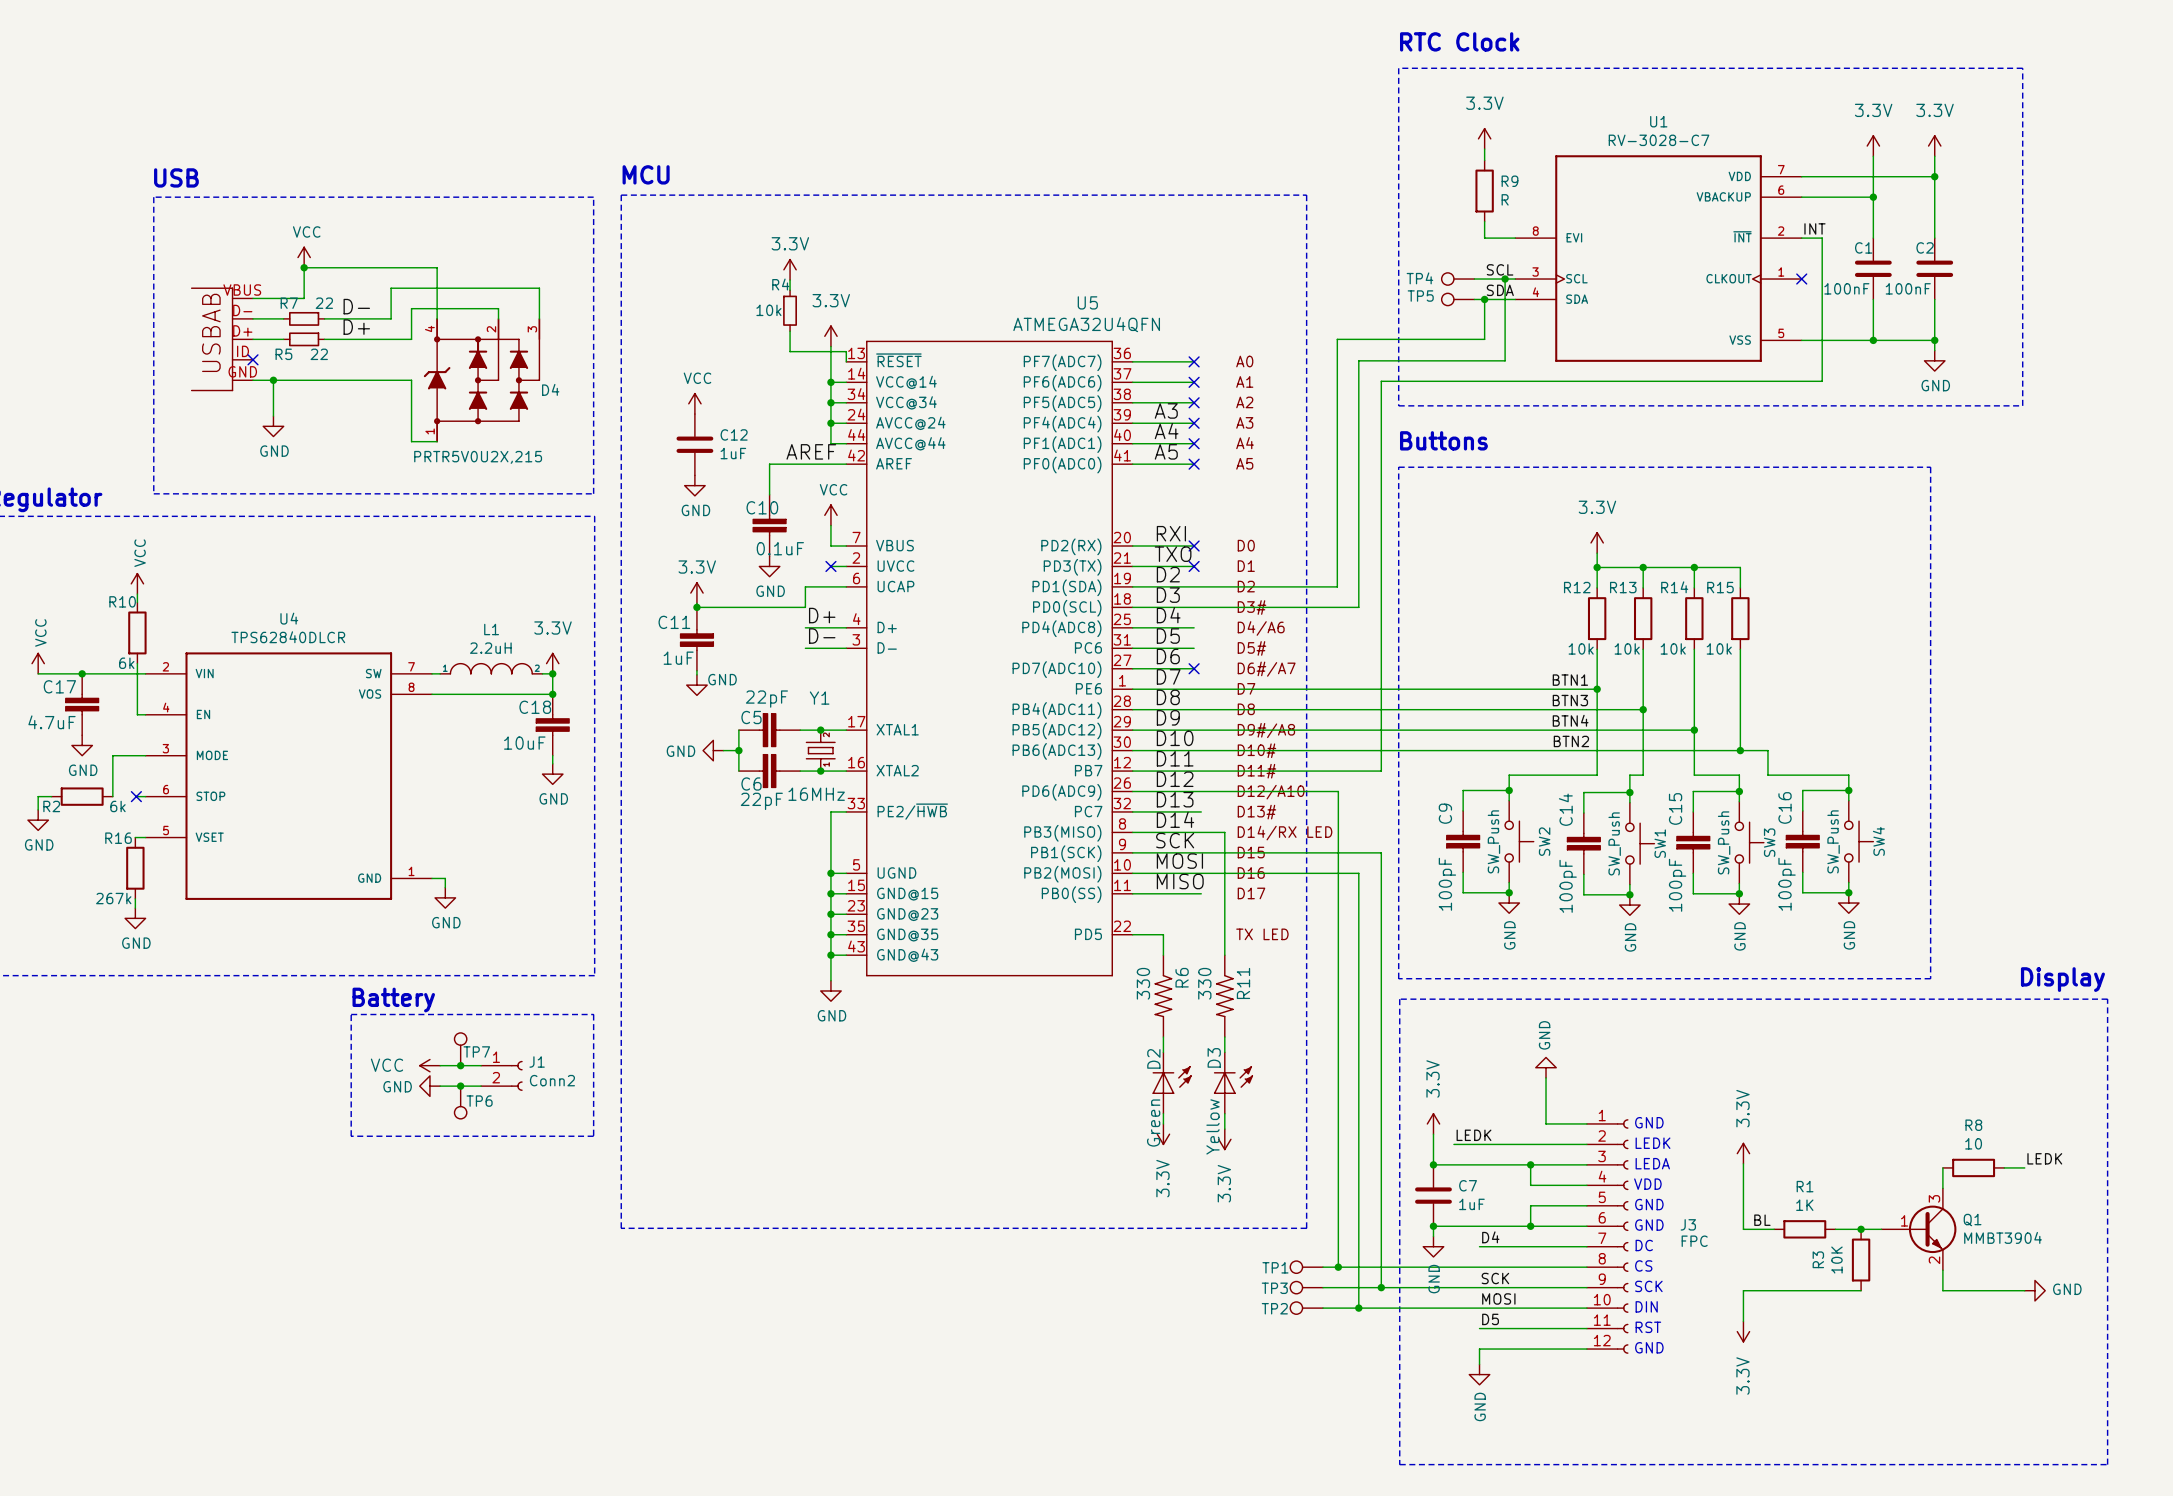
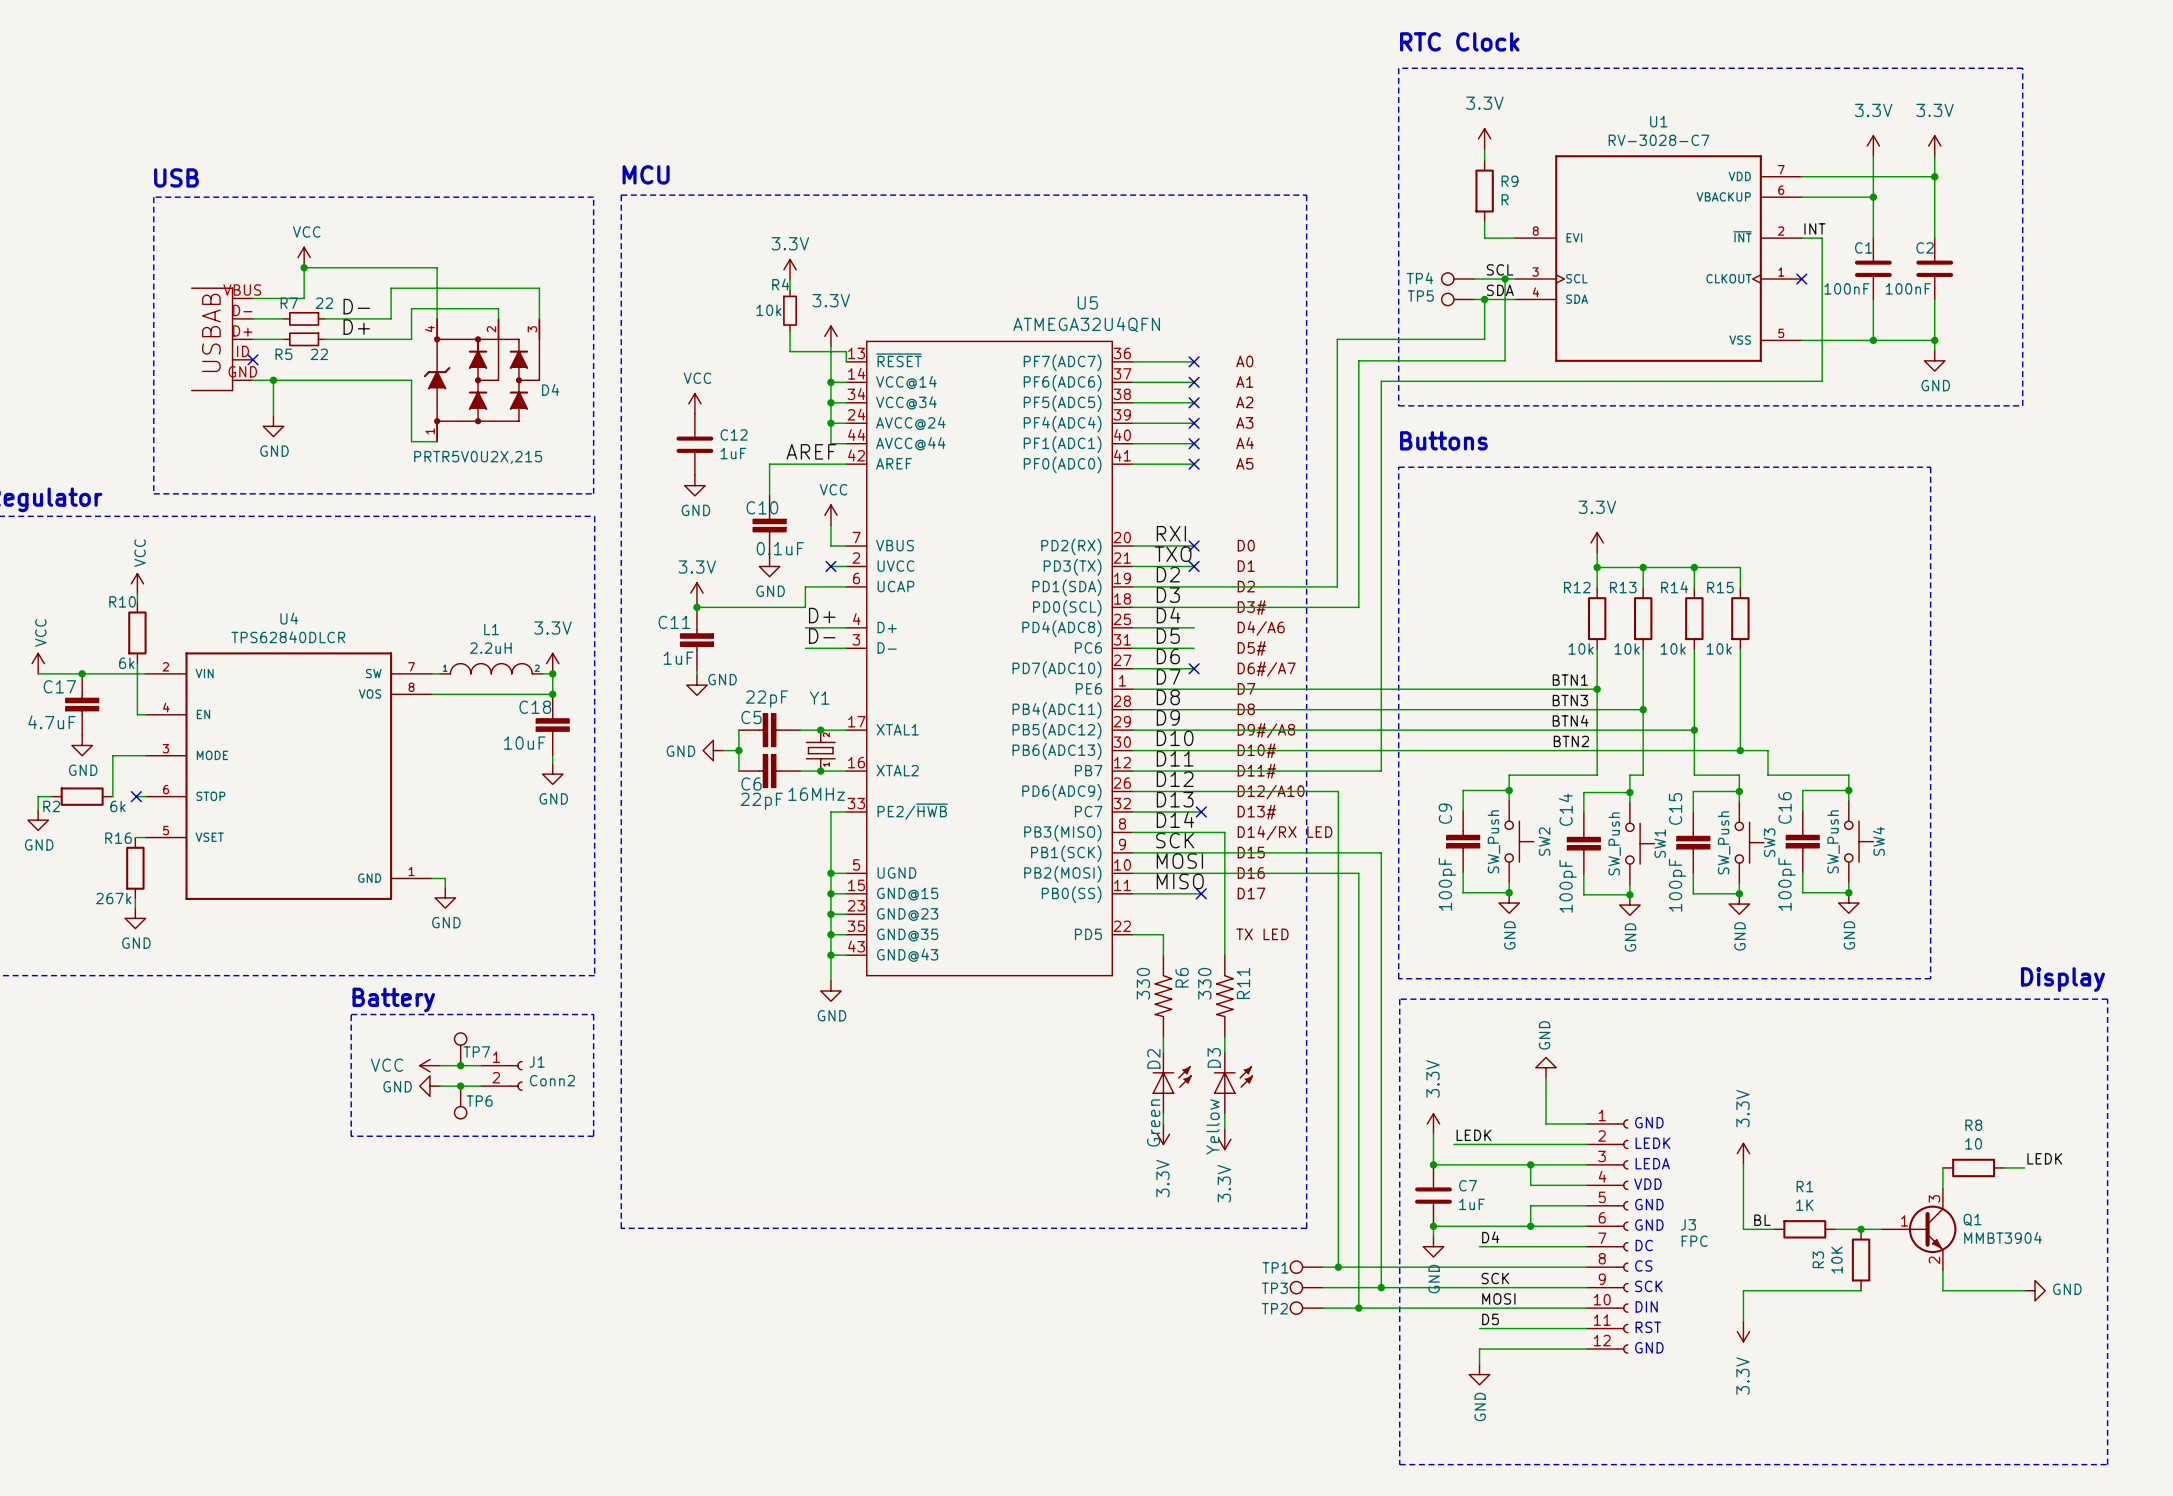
label: A3 (1166, 410) -> none
label: A4 (1166, 431) -> none
label: A5 (1166, 451) -> none
no-connect mark: none -> (1201, 811)
no-connect mark: none -> (1201, 893)

